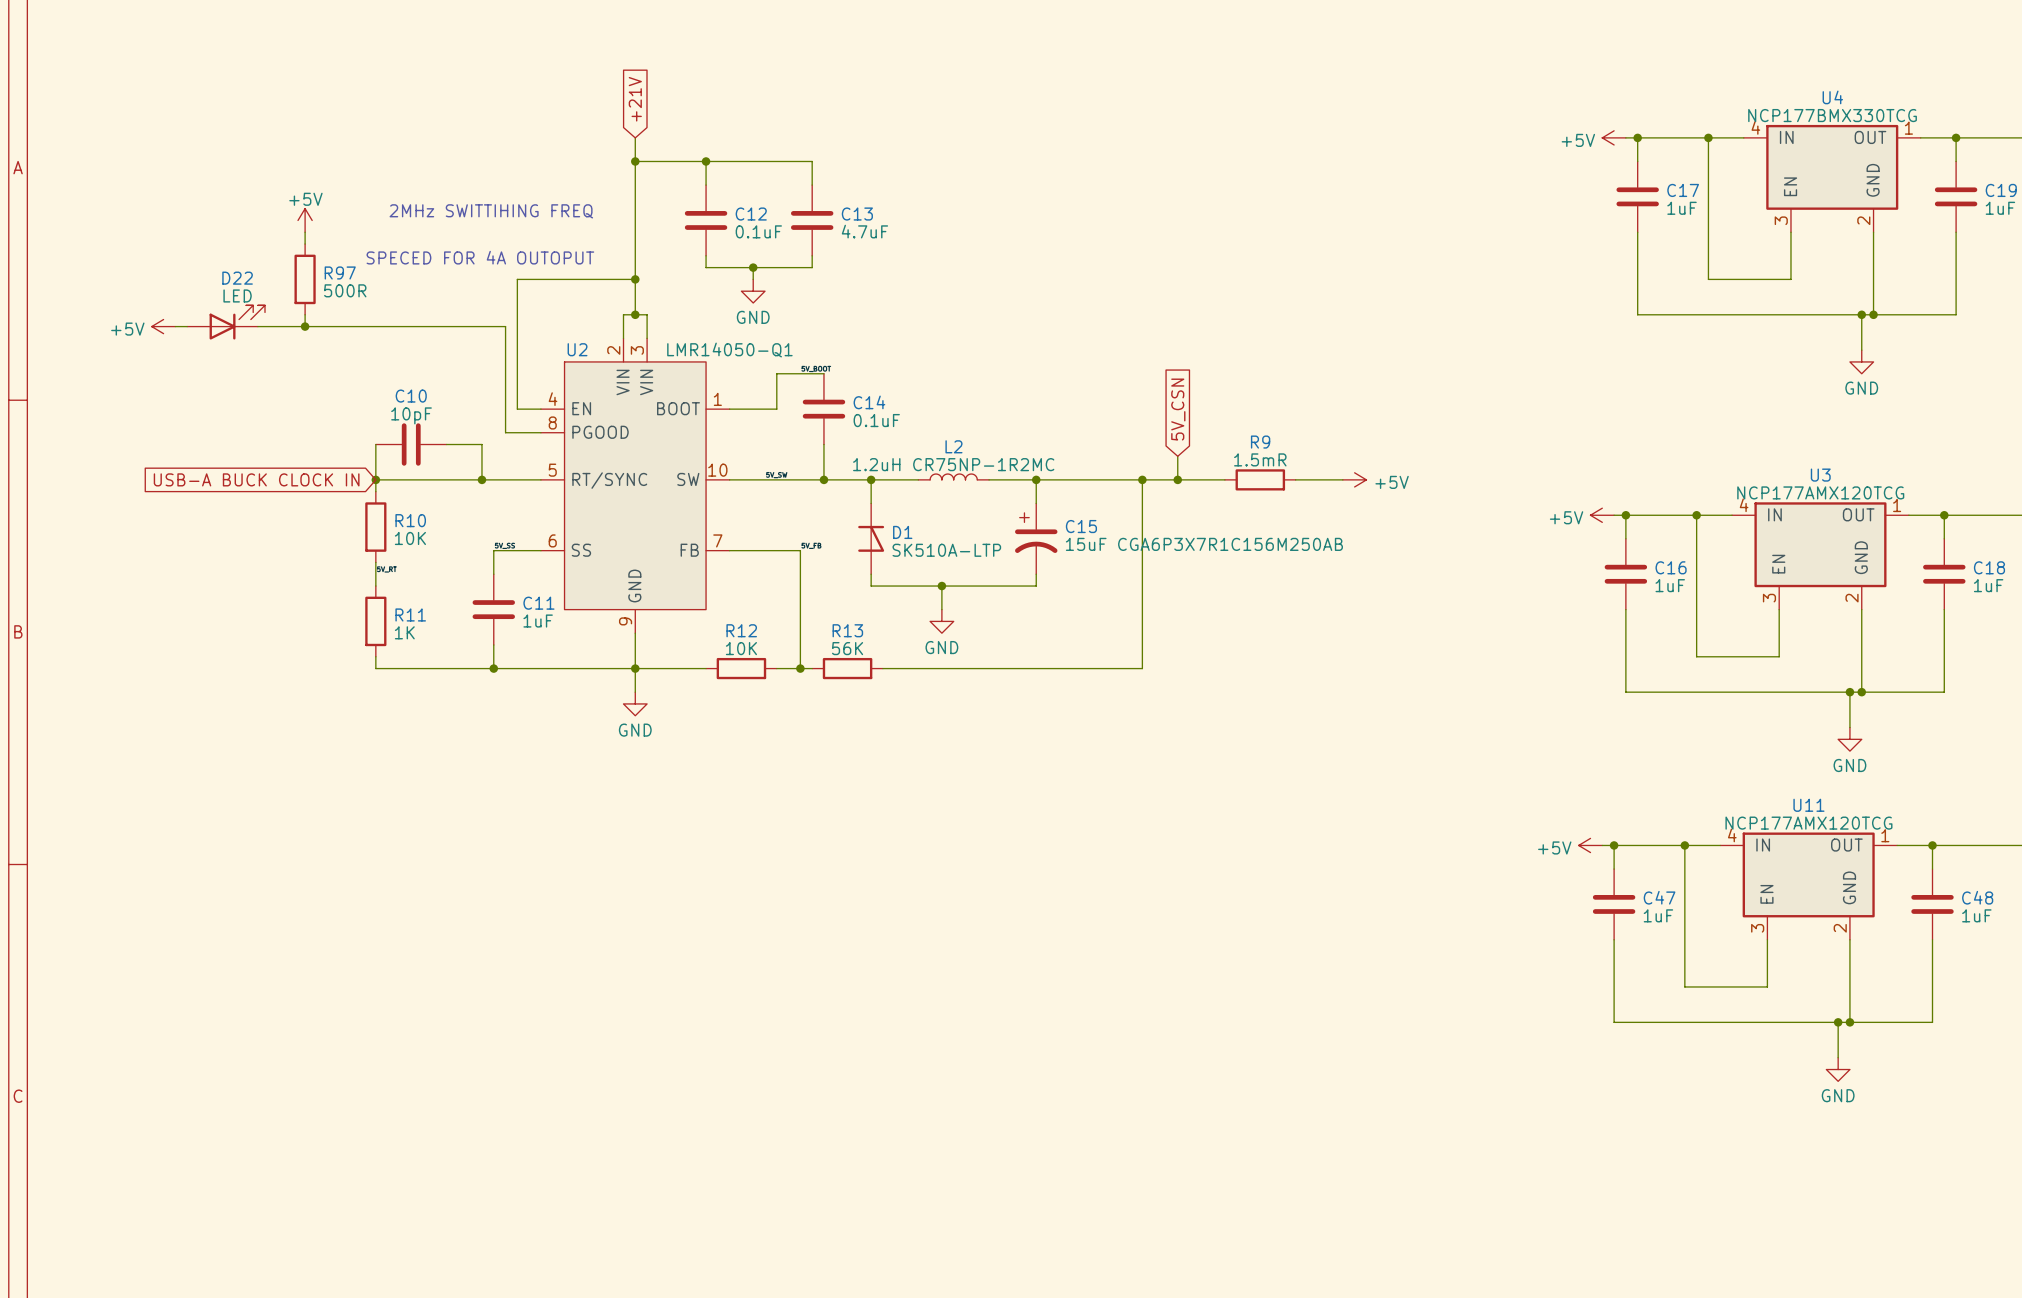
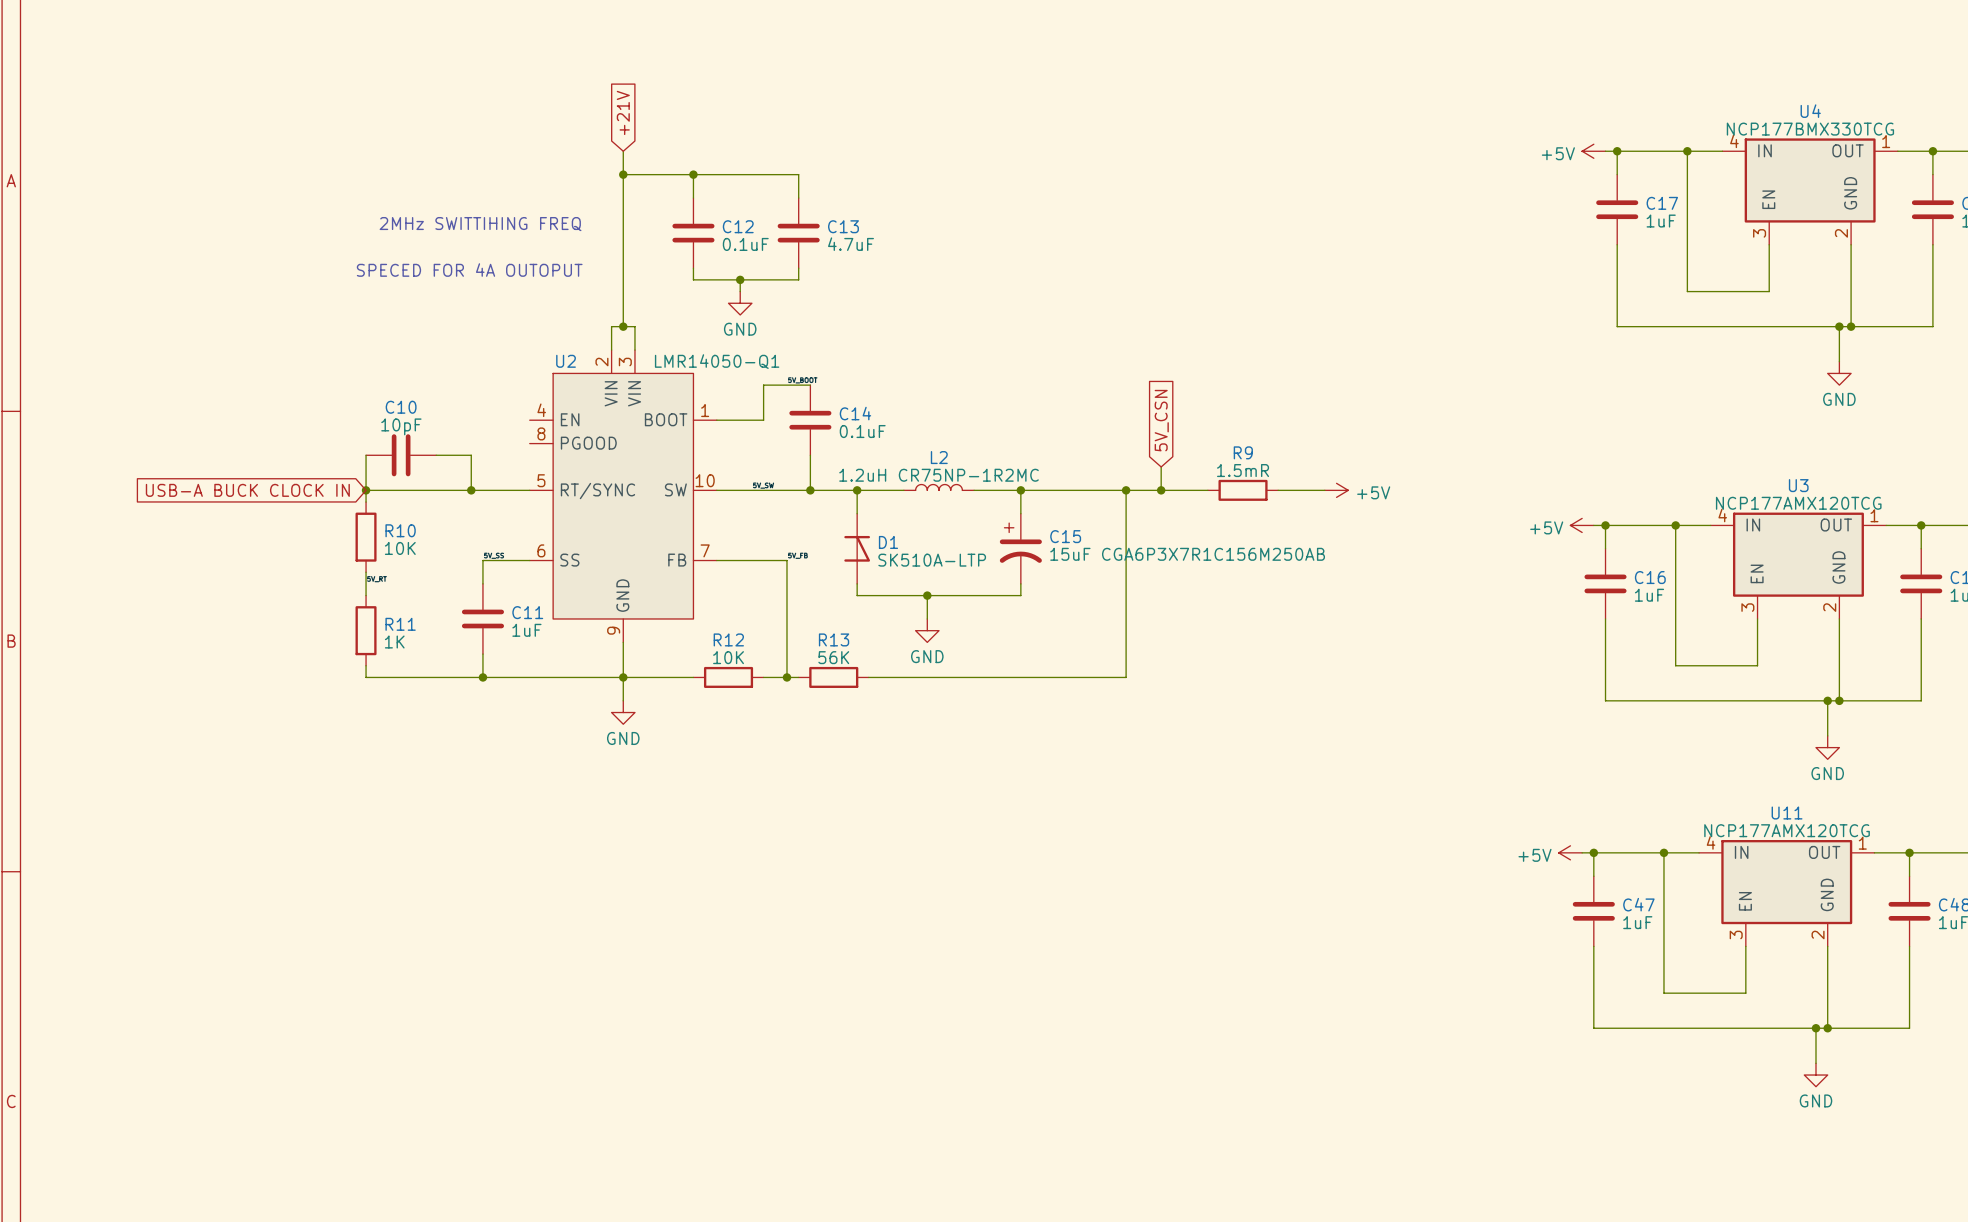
power symbol: +5V (305, 220) -> none
wire: (305, 232) (305, 244) -> none
R97: 500R (305, 279) -> none
wire: (635, 279) (517, 279) (517, 409) (540, 409) -> none
junction: (635, 279) -> none
wire: (305, 314) (305, 326) -> none
D22: LED (226, 322) -> none
power symbol: +5V (163, 326) -> none
wire: (175, 326) (187, 326) -> none
wire: (257, 326) (505, 326) (505, 432) (540, 432) -> none
junction: (305, 326) -> none

